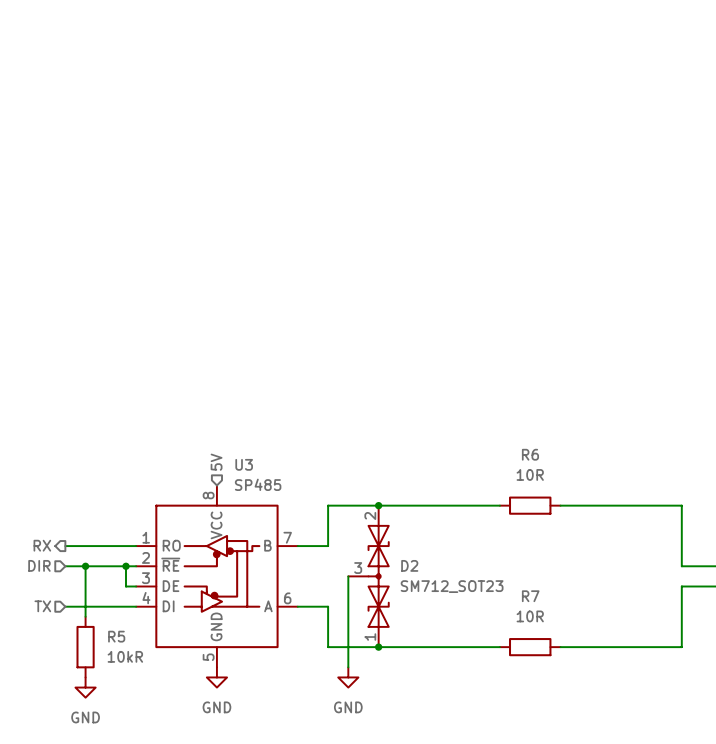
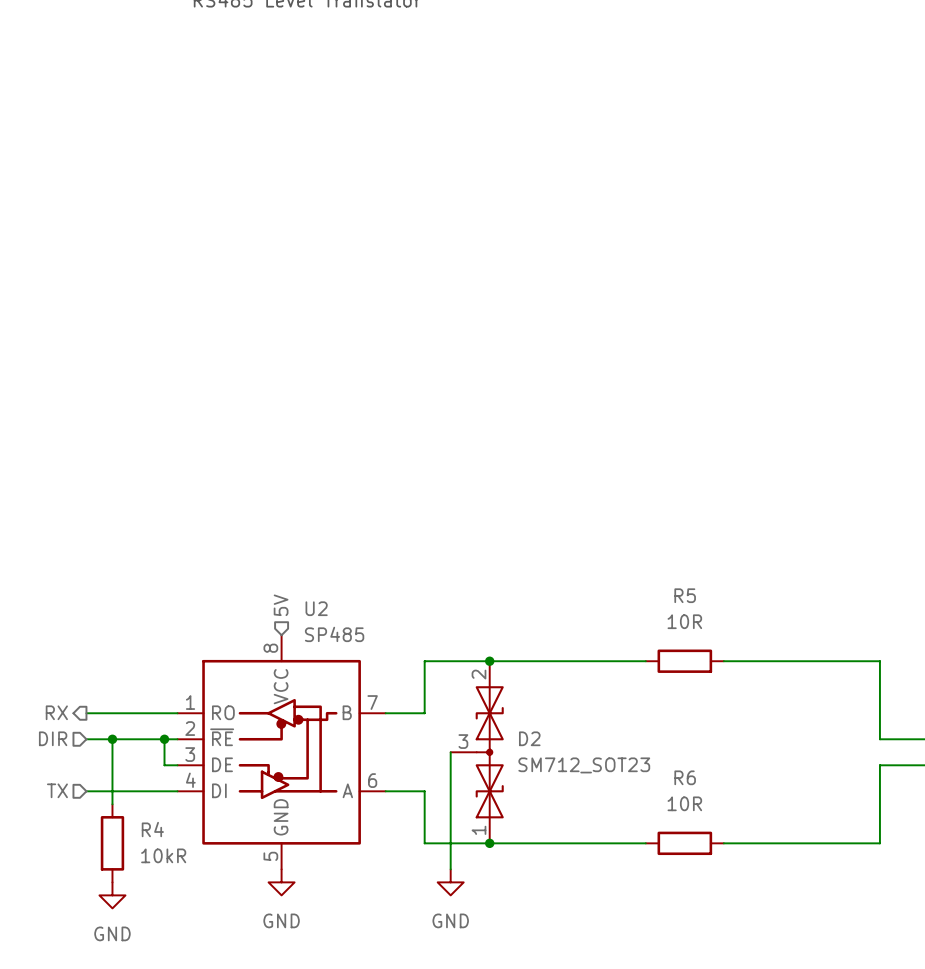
R6 name: R6 (530, 454) -> R5 (685, 595)
U3 name: U3 (244, 464) -> U2 (316, 608)
R7 name: R7 (530, 596) -> R6 (685, 777)
R5 name: R5 (116, 636) -> R4 (152, 829)

